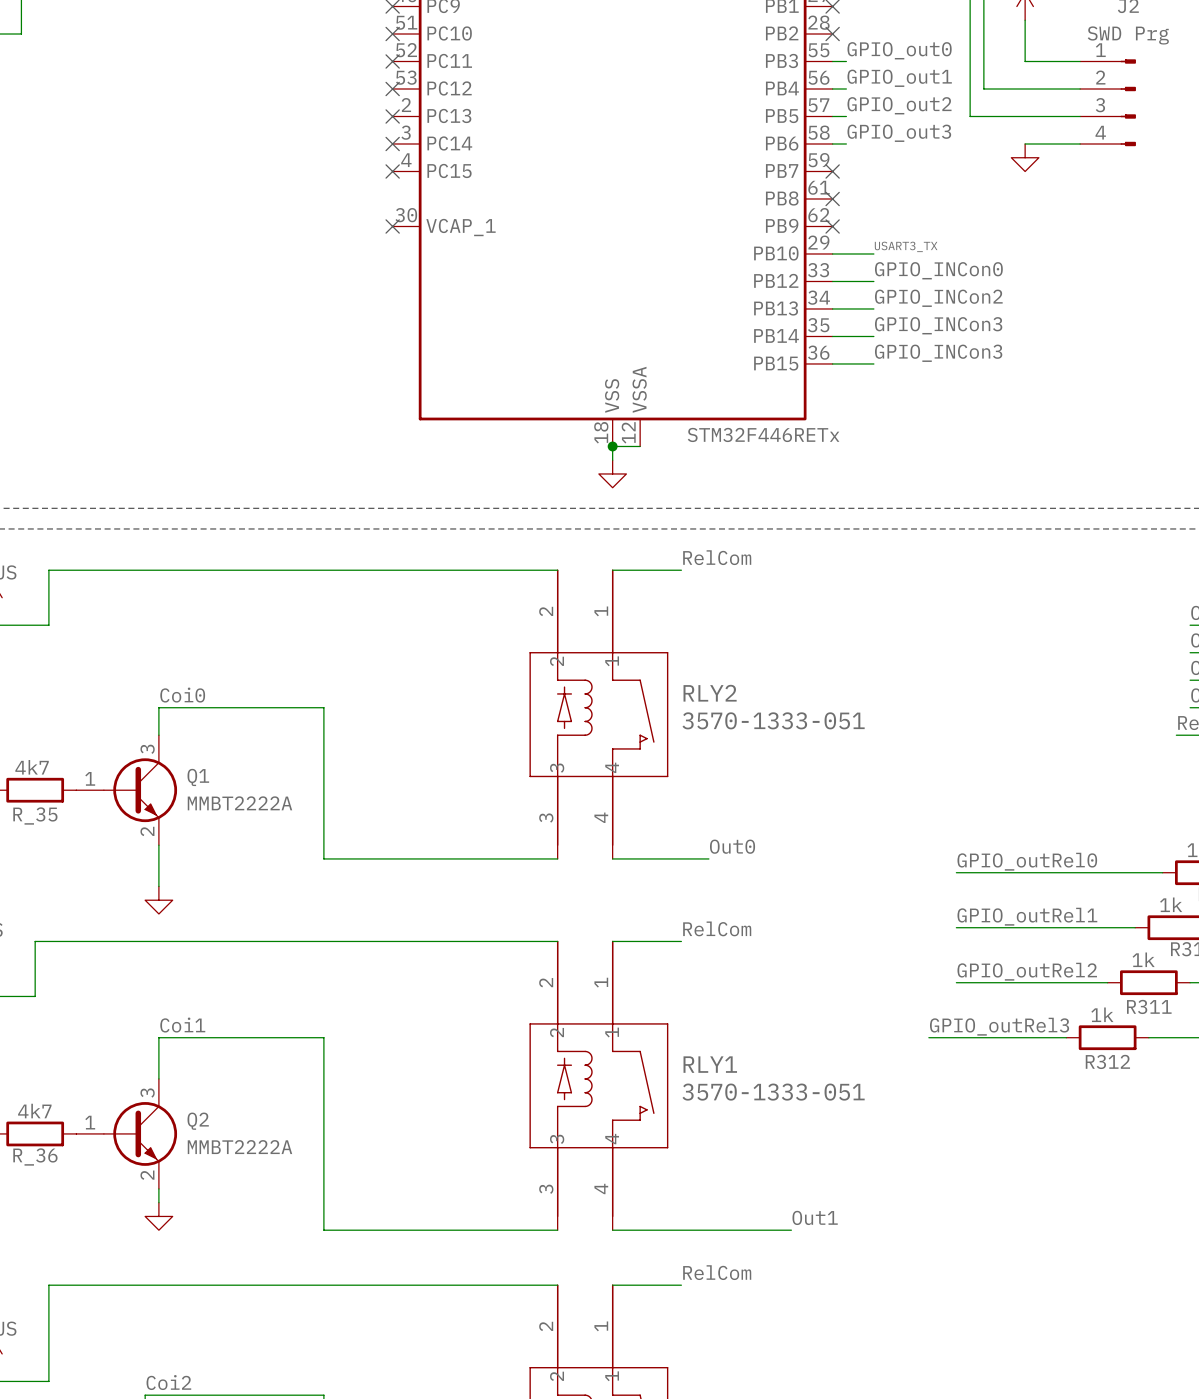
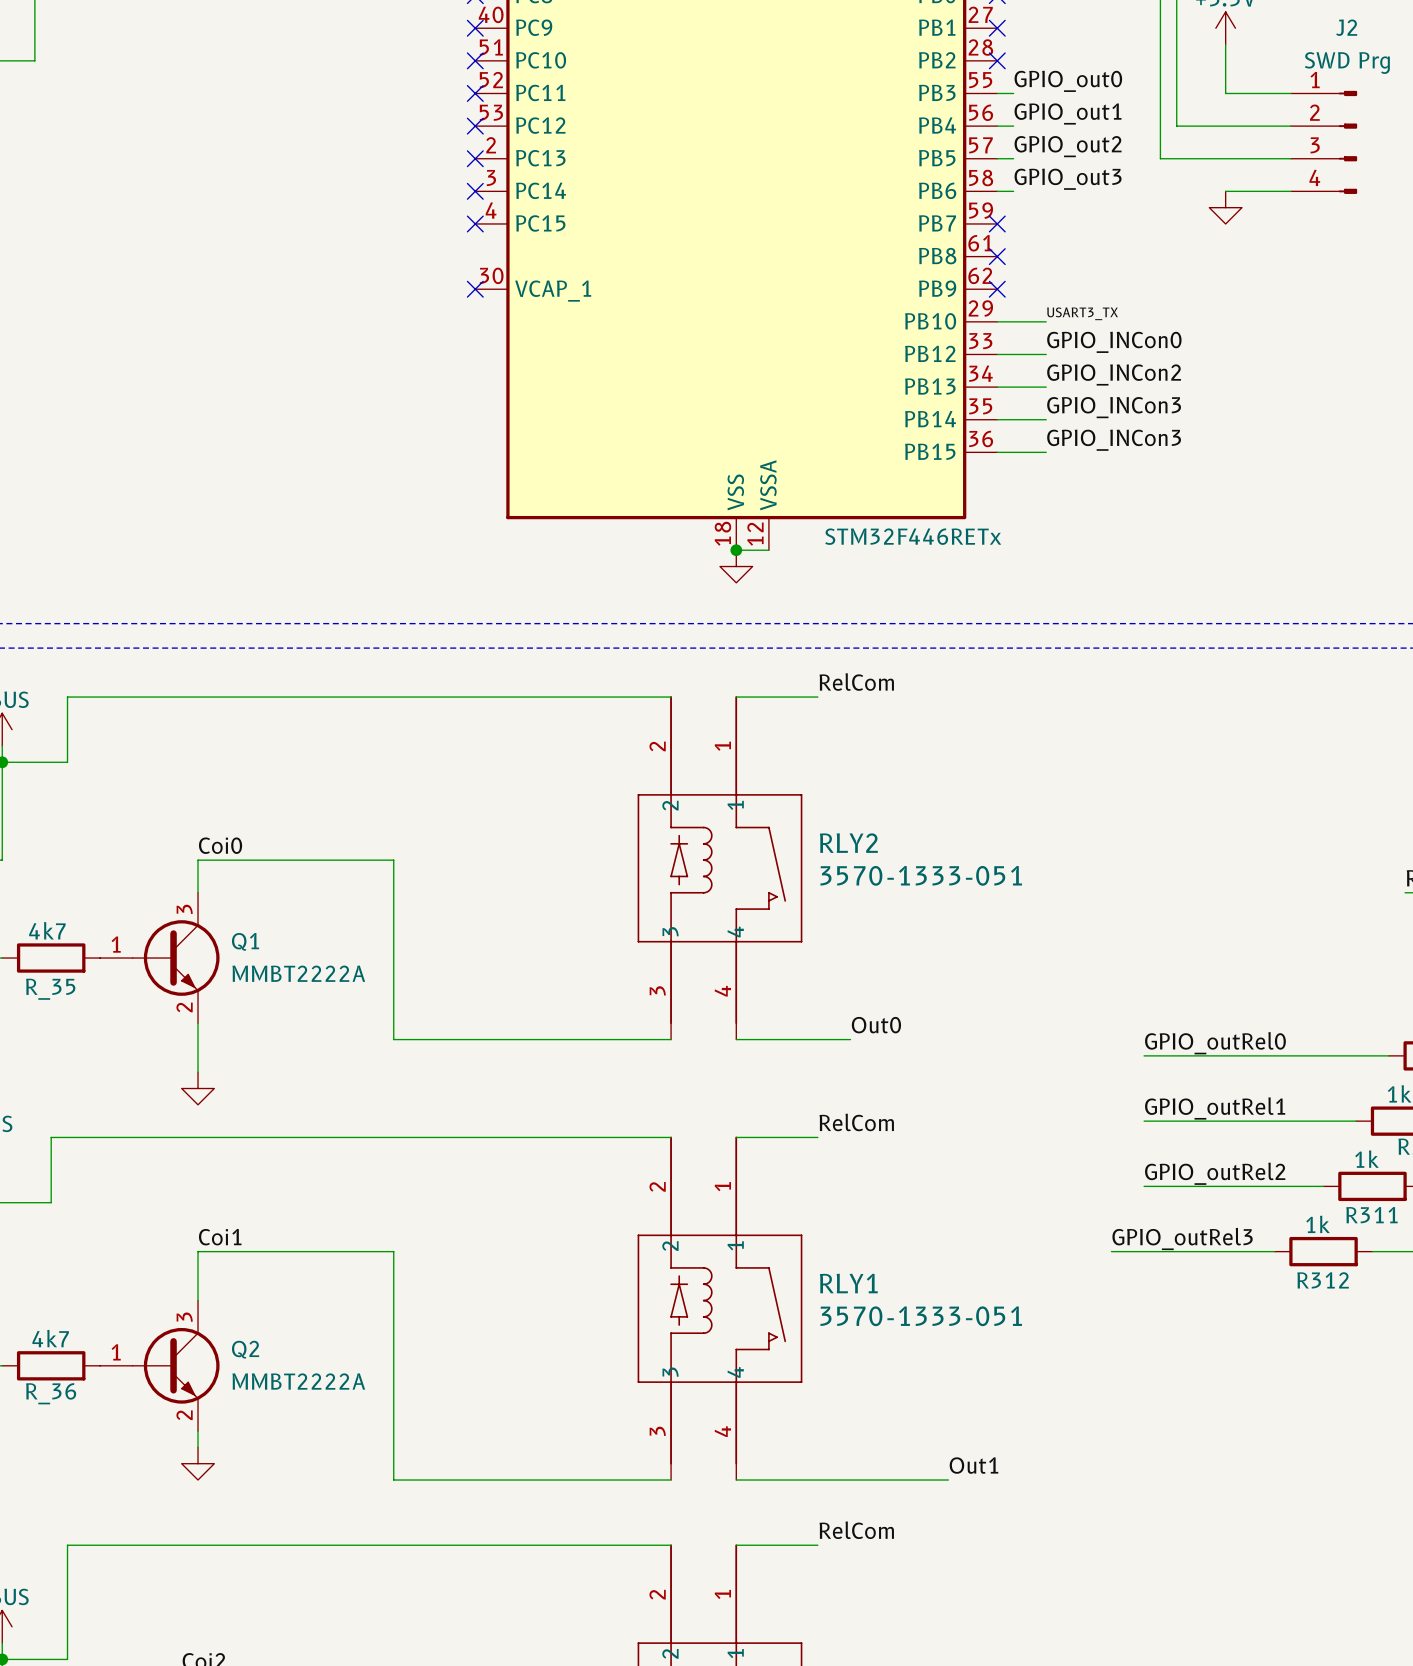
power symbol position: (612, 473) -> (736, 566)

